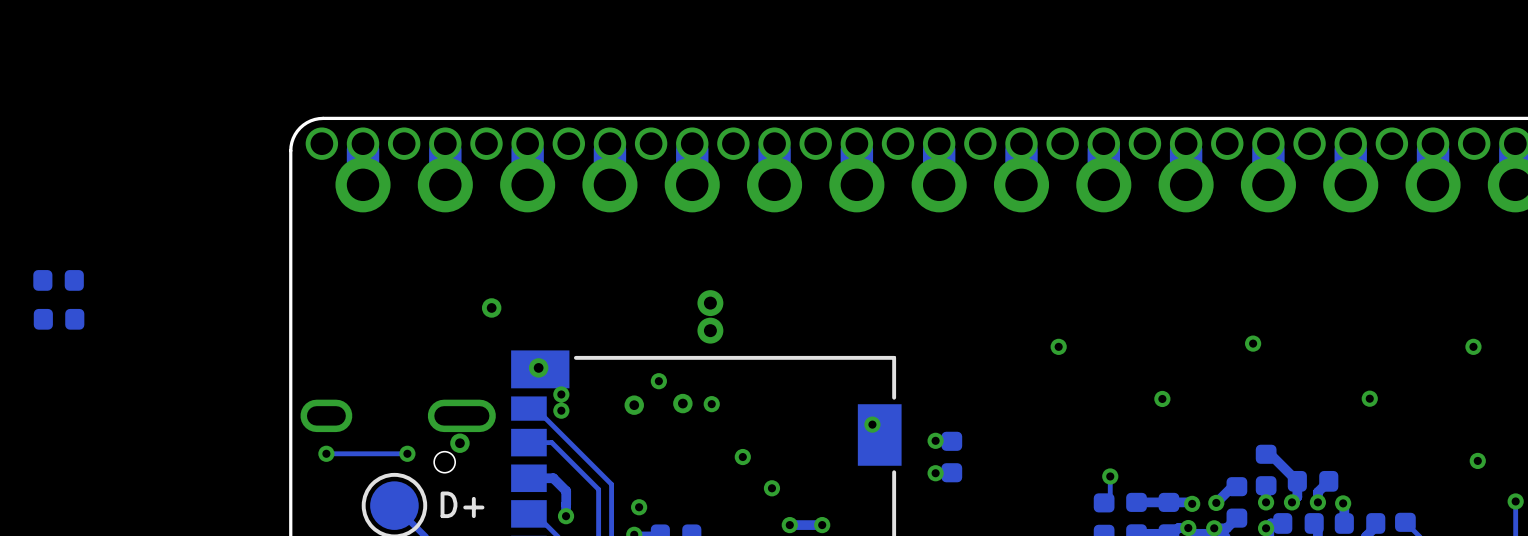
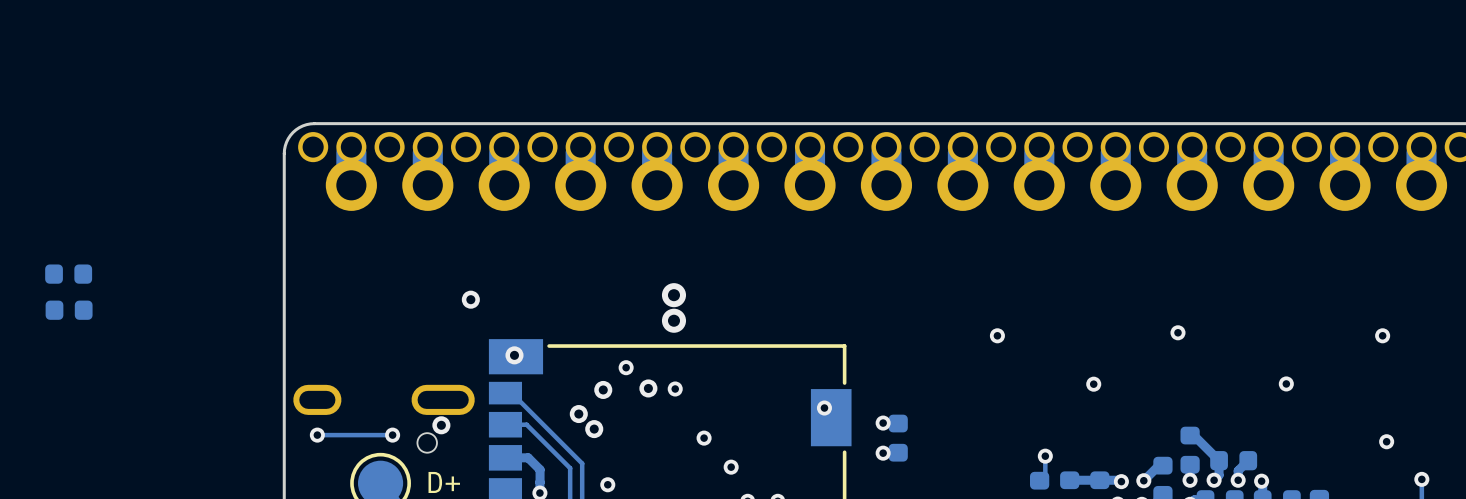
via: (561, 394) -> none
via: (561, 410) -> none
via: none -> (578, 414)
via: none -> (594, 429)

